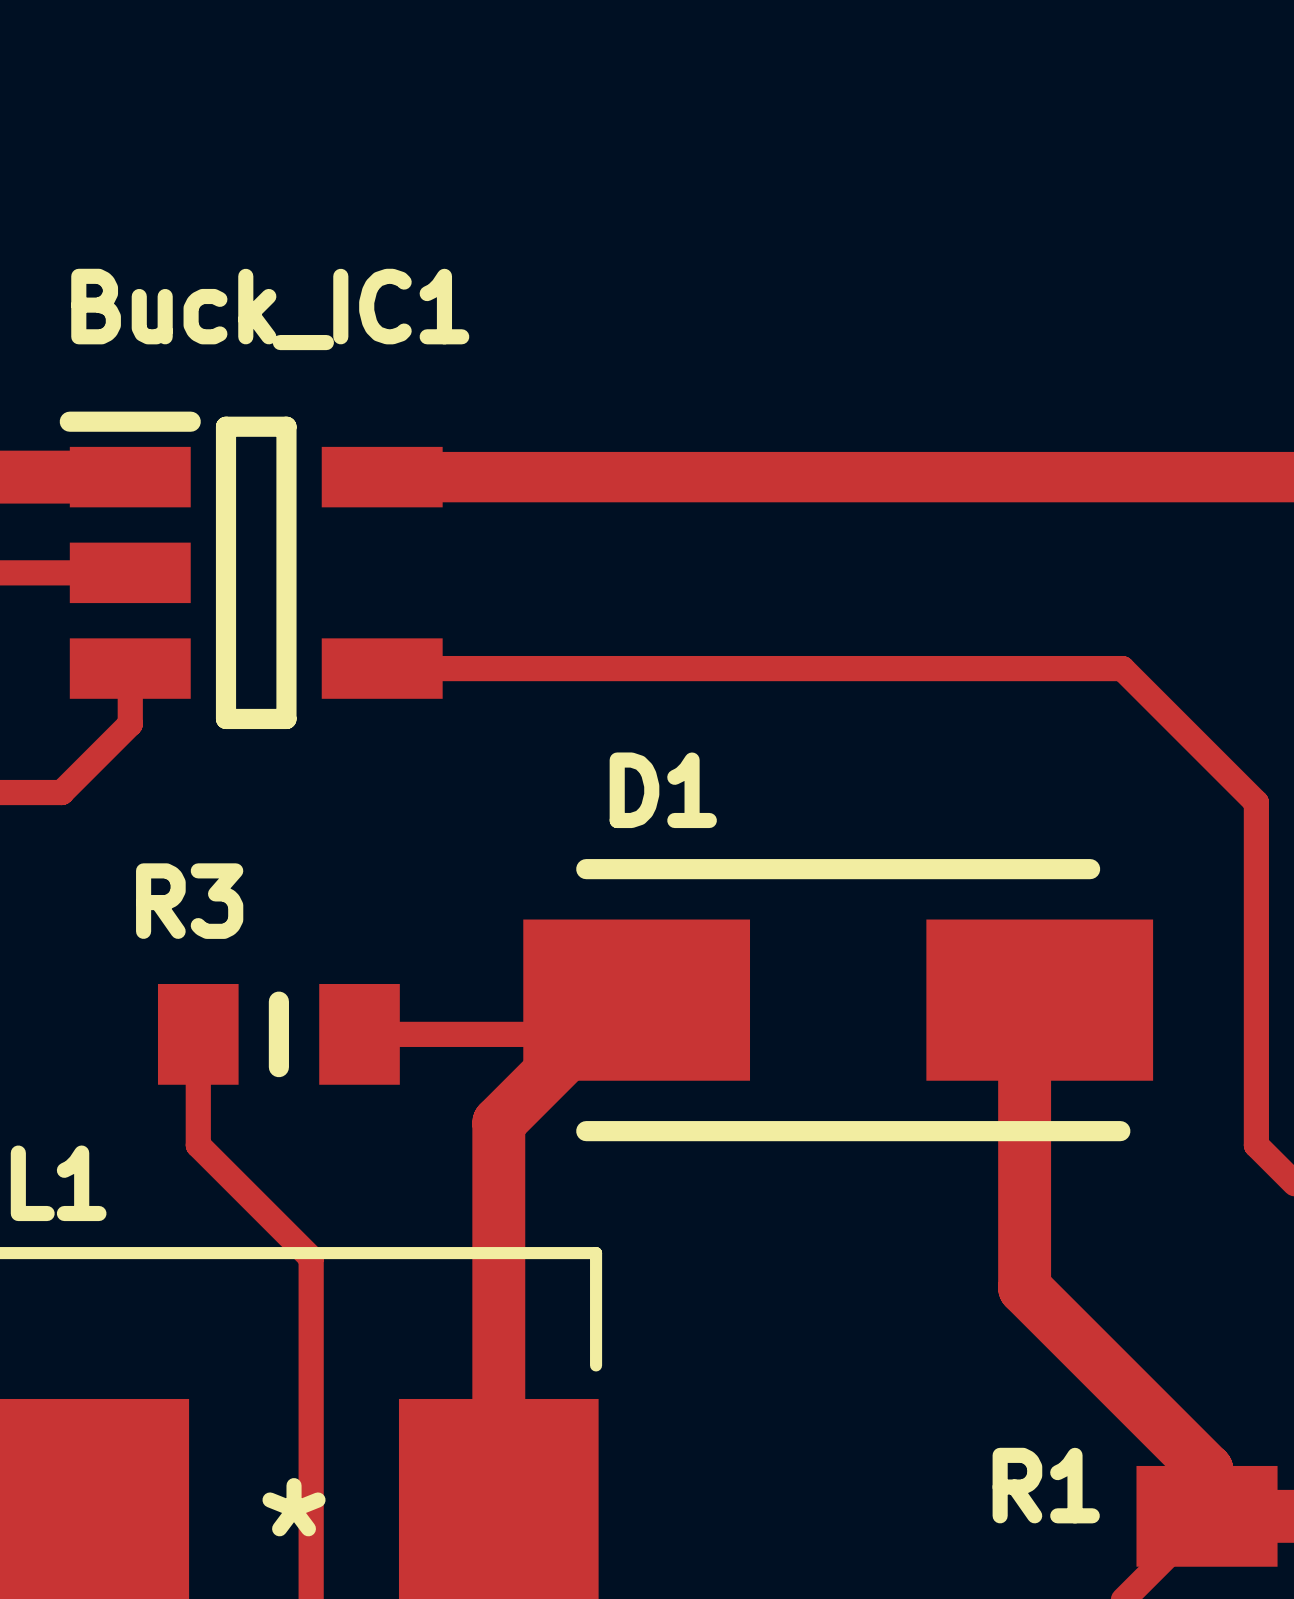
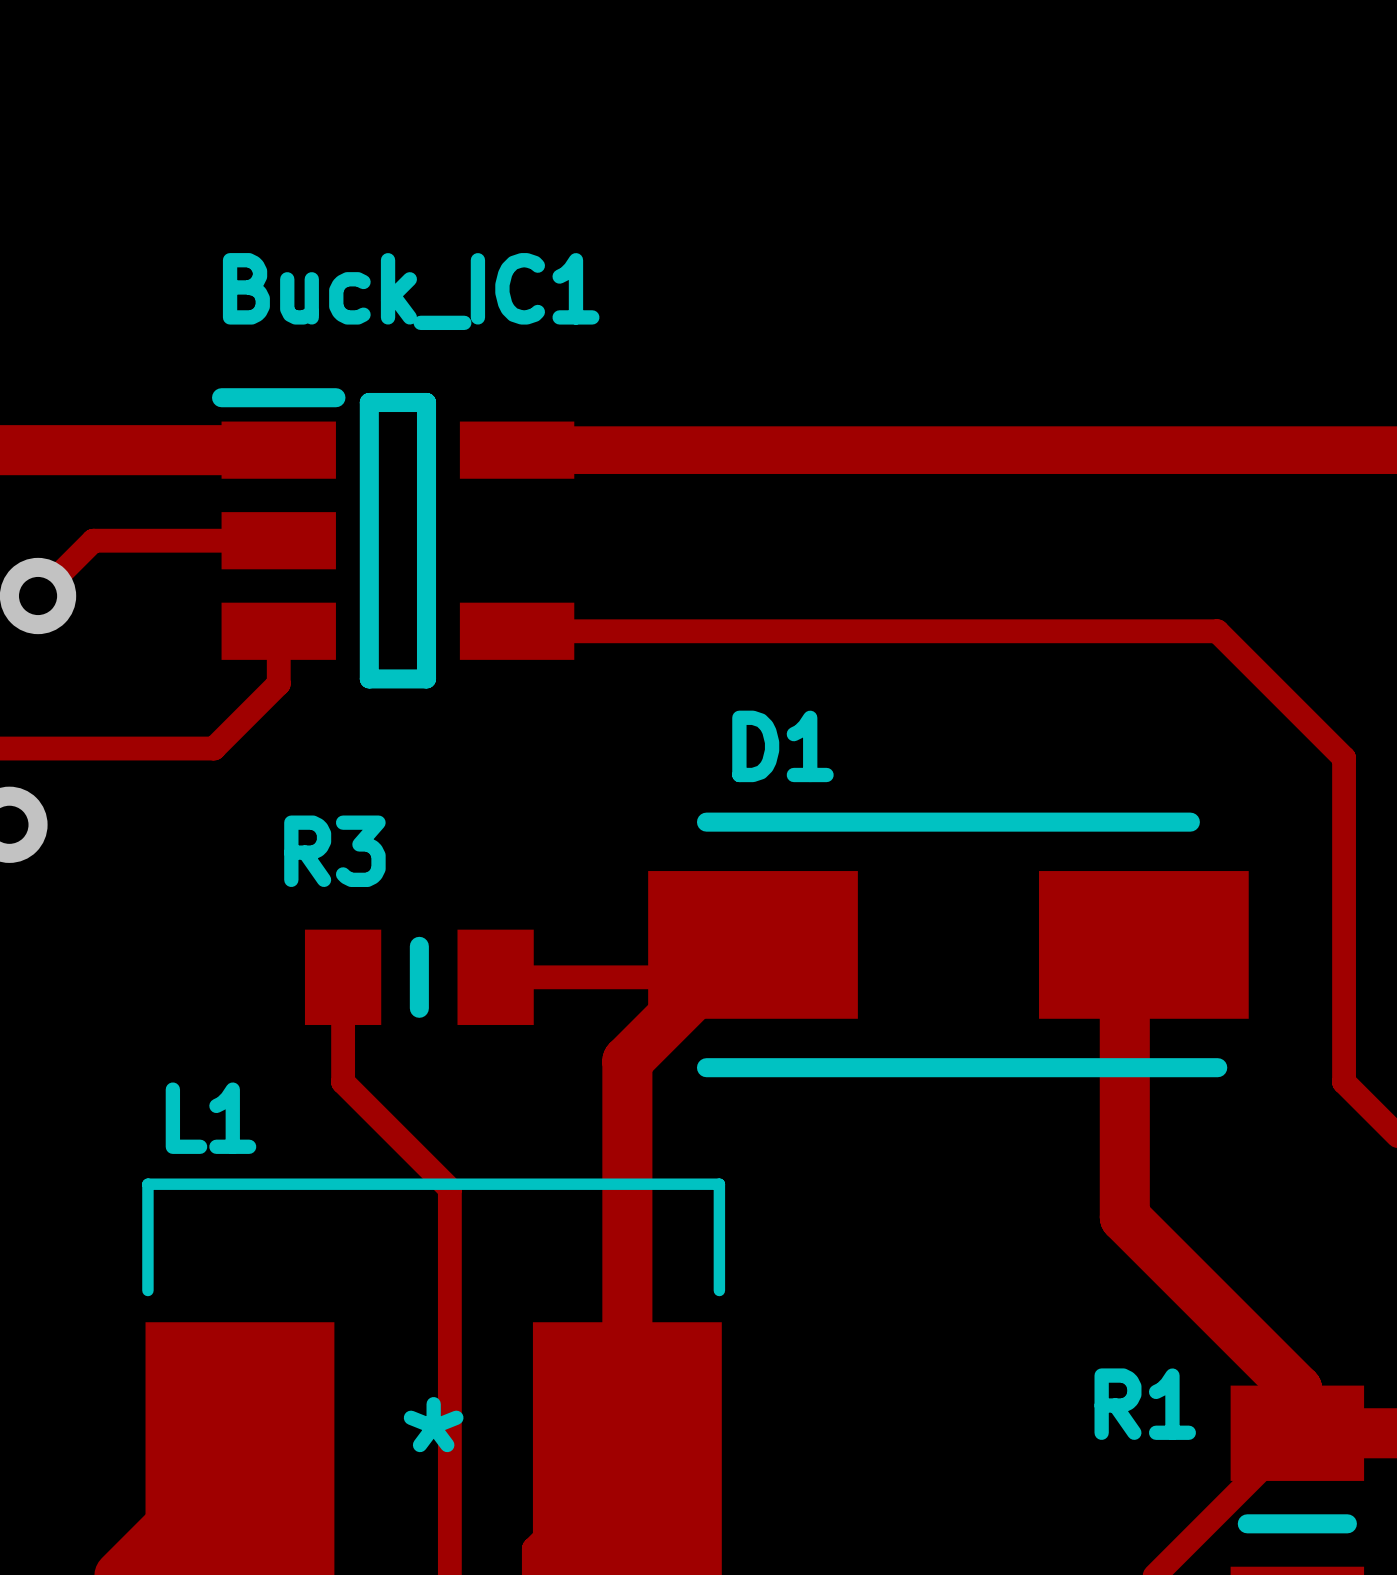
D1 footprint: [523, 859, 1154, 1142] -> [648, 812, 1249, 1078]

